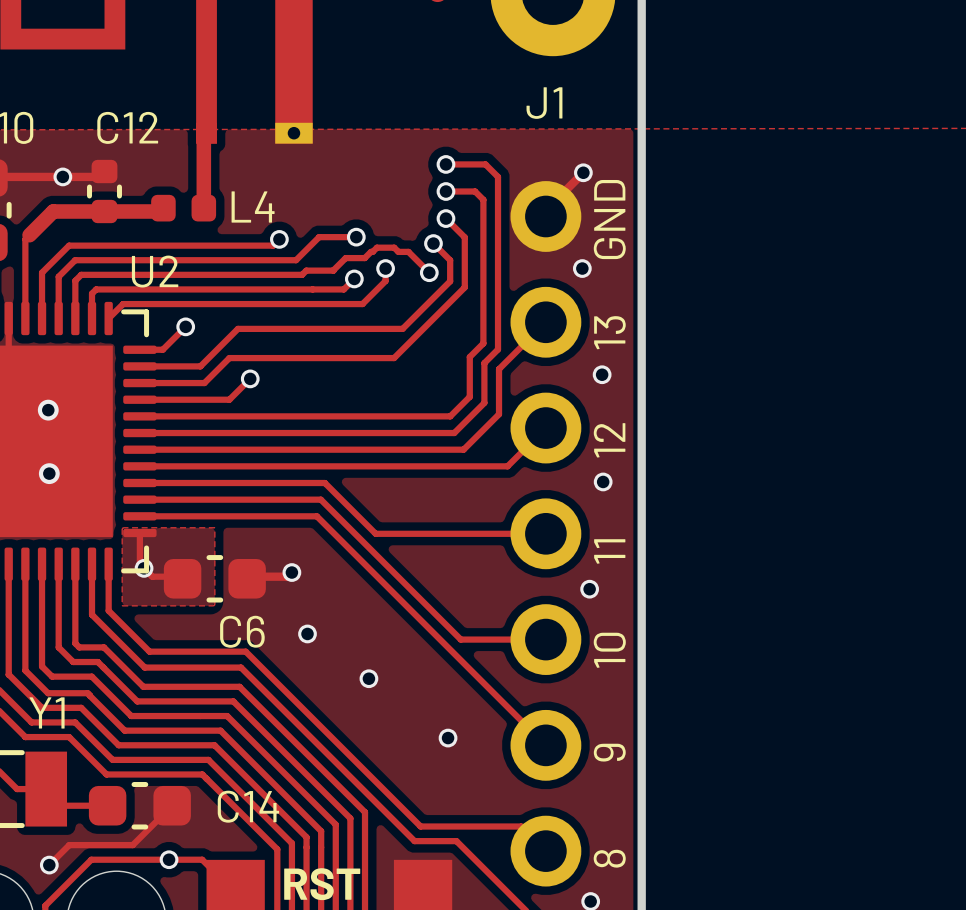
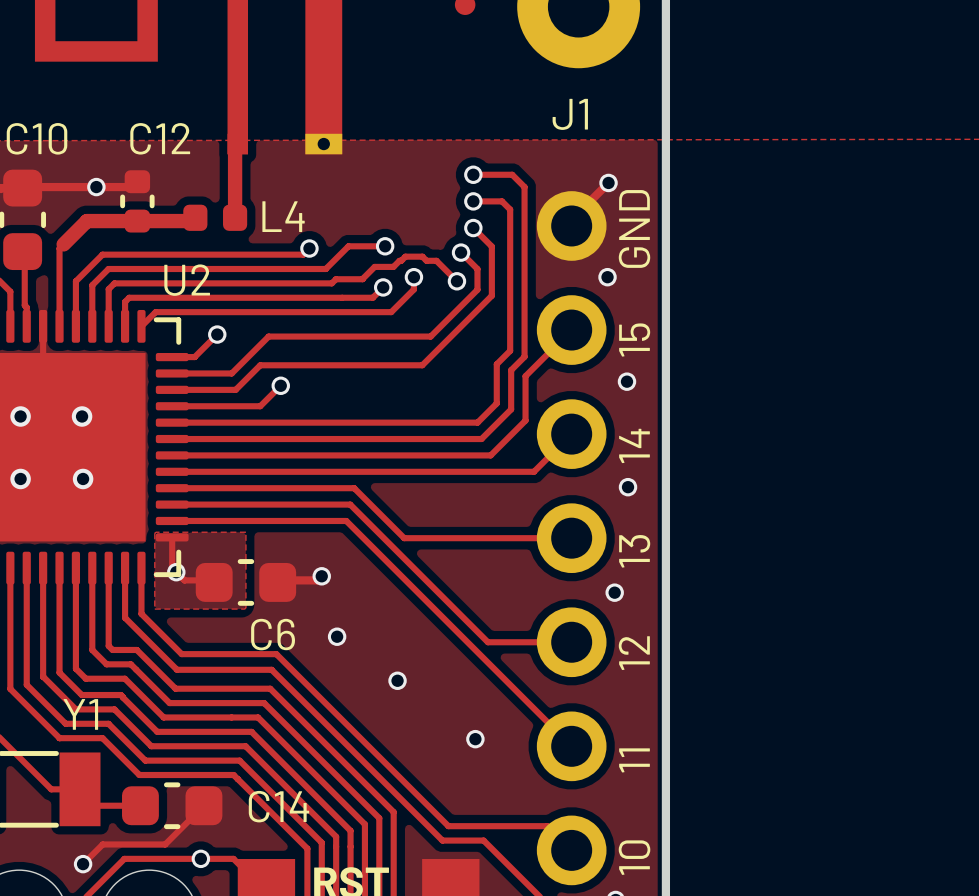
text: 13 (609, 332) -> 15 (634, 340)
text: 12 (609, 440) -> 14 (634, 445)
text: 11 (609, 551) -> 13 (634, 551)
text: 10 (609, 650) -> 12 (634, 653)
text: 9 (609, 752) -> 11 (634, 760)
text: 8 (609, 858) -> 10 (634, 857)

